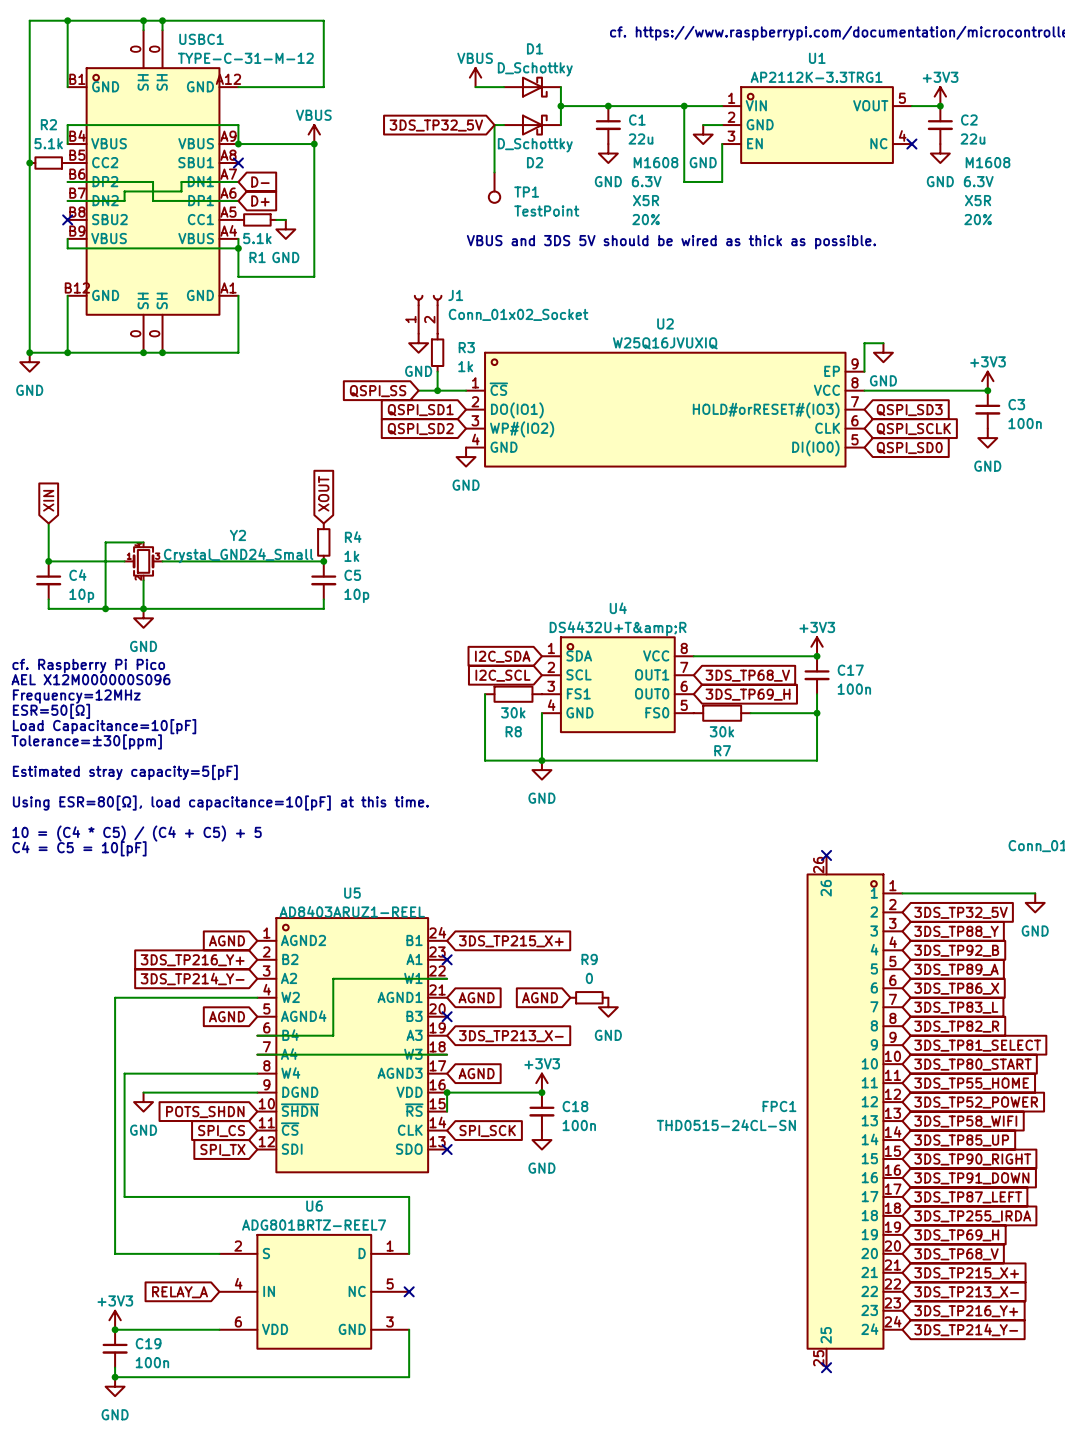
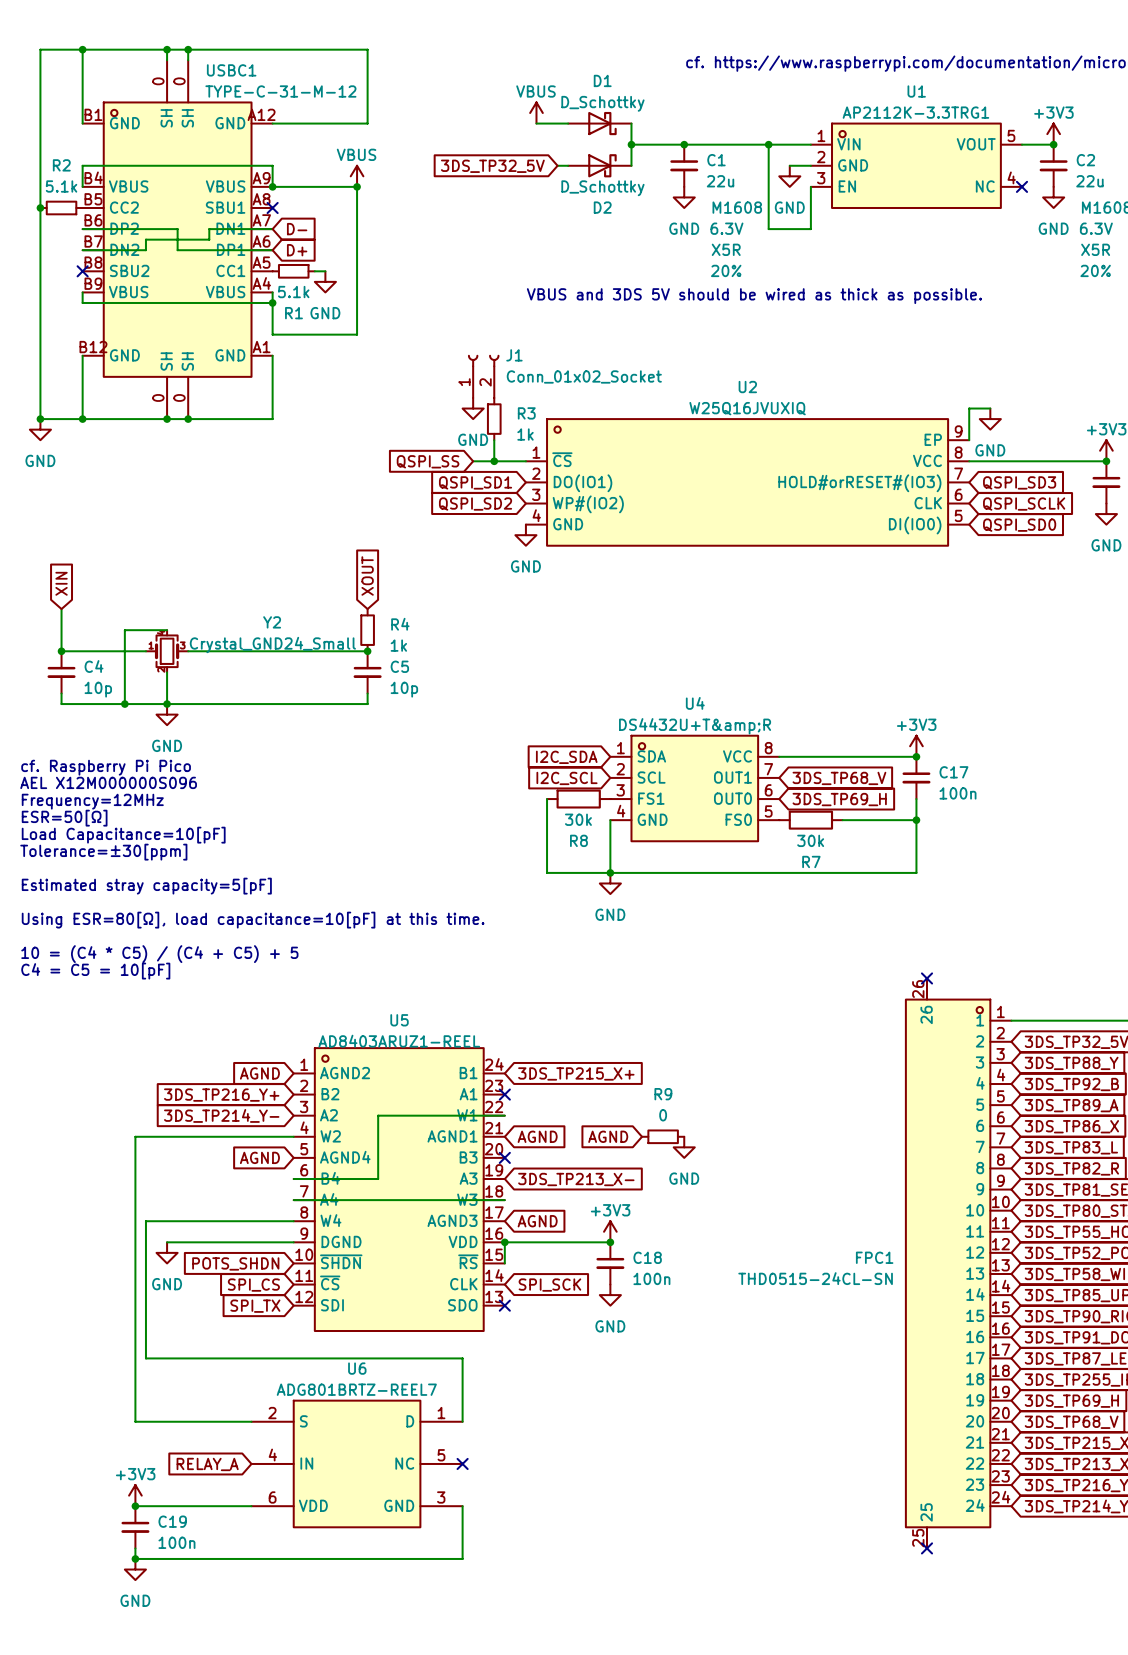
wire: (494, 125) (494, 172) -> none
TP1: TestPoint (494, 187) -> none

